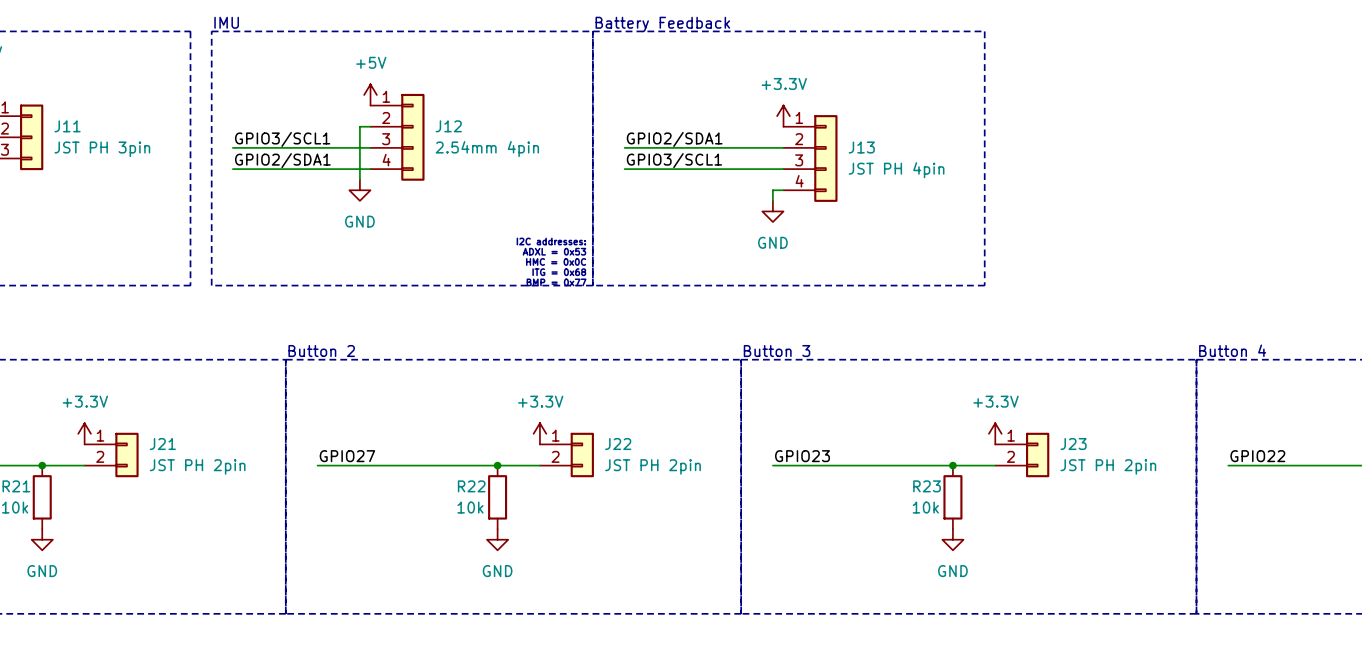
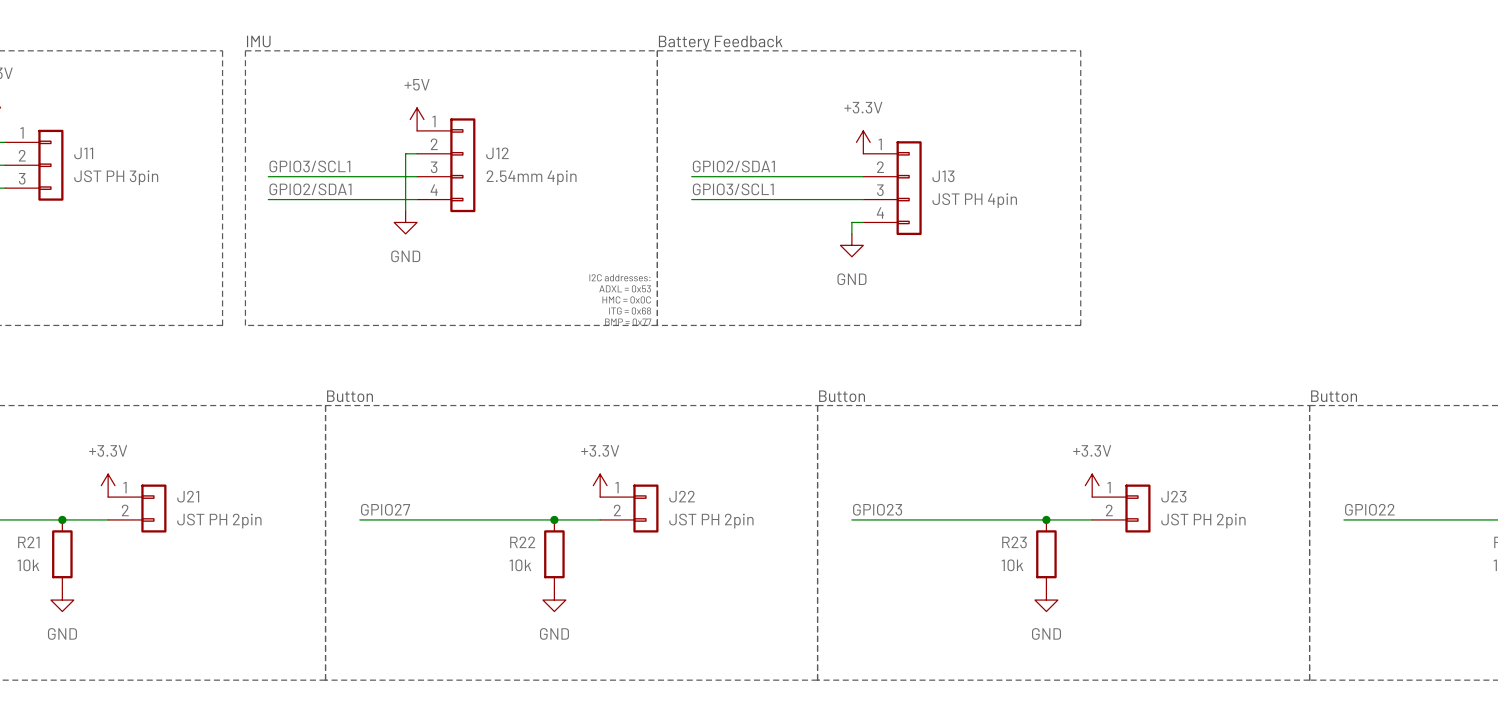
text: Button 4 (1232, 350) -> Button (1334, 396)
text: Button 2 (321, 351) -> Button (350, 396)
text: Button 3 (777, 351) -> Button (842, 396)

